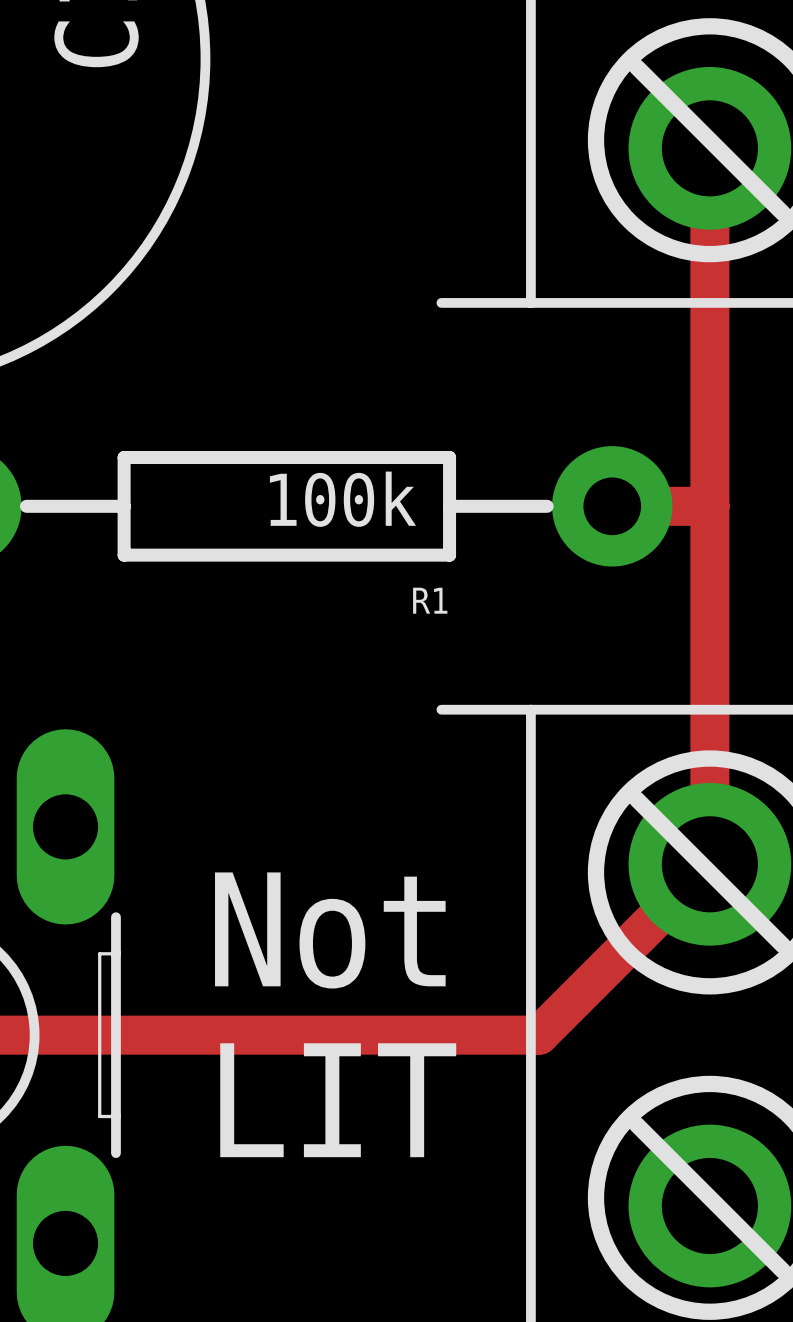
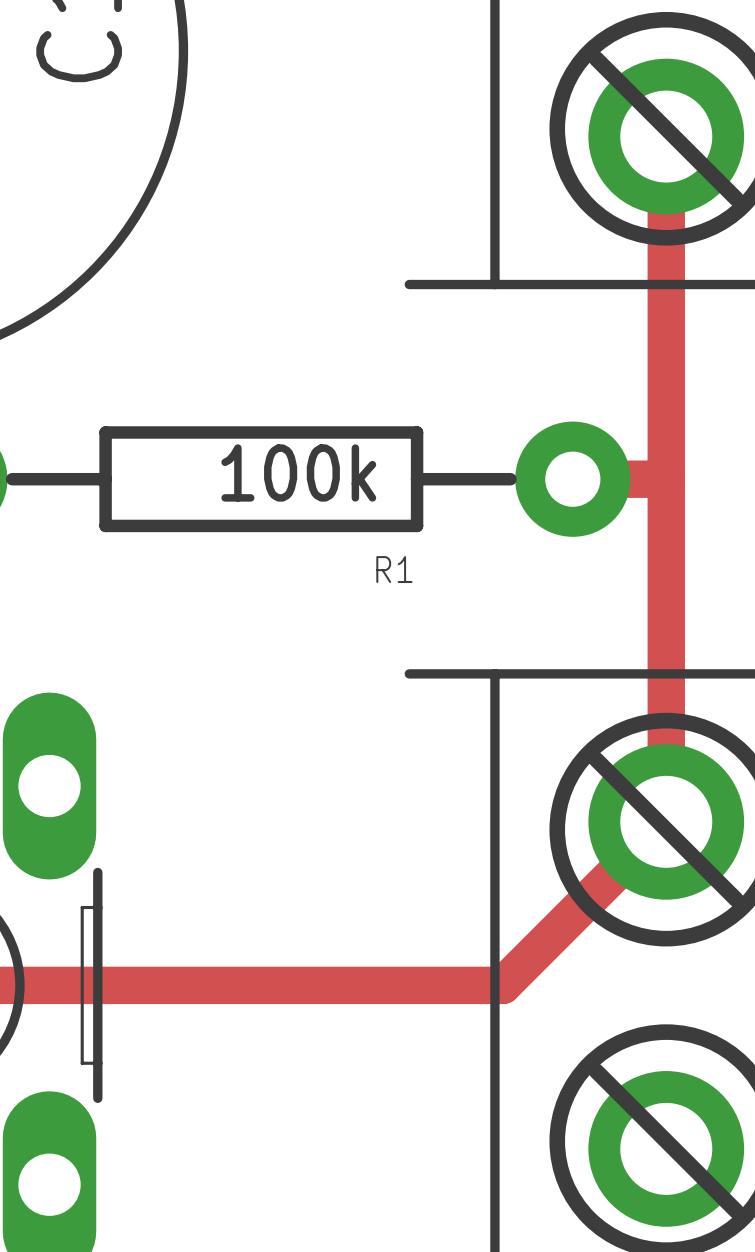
text: Not (330, 930) -> none
text: LIT (338, 1100) -> none

